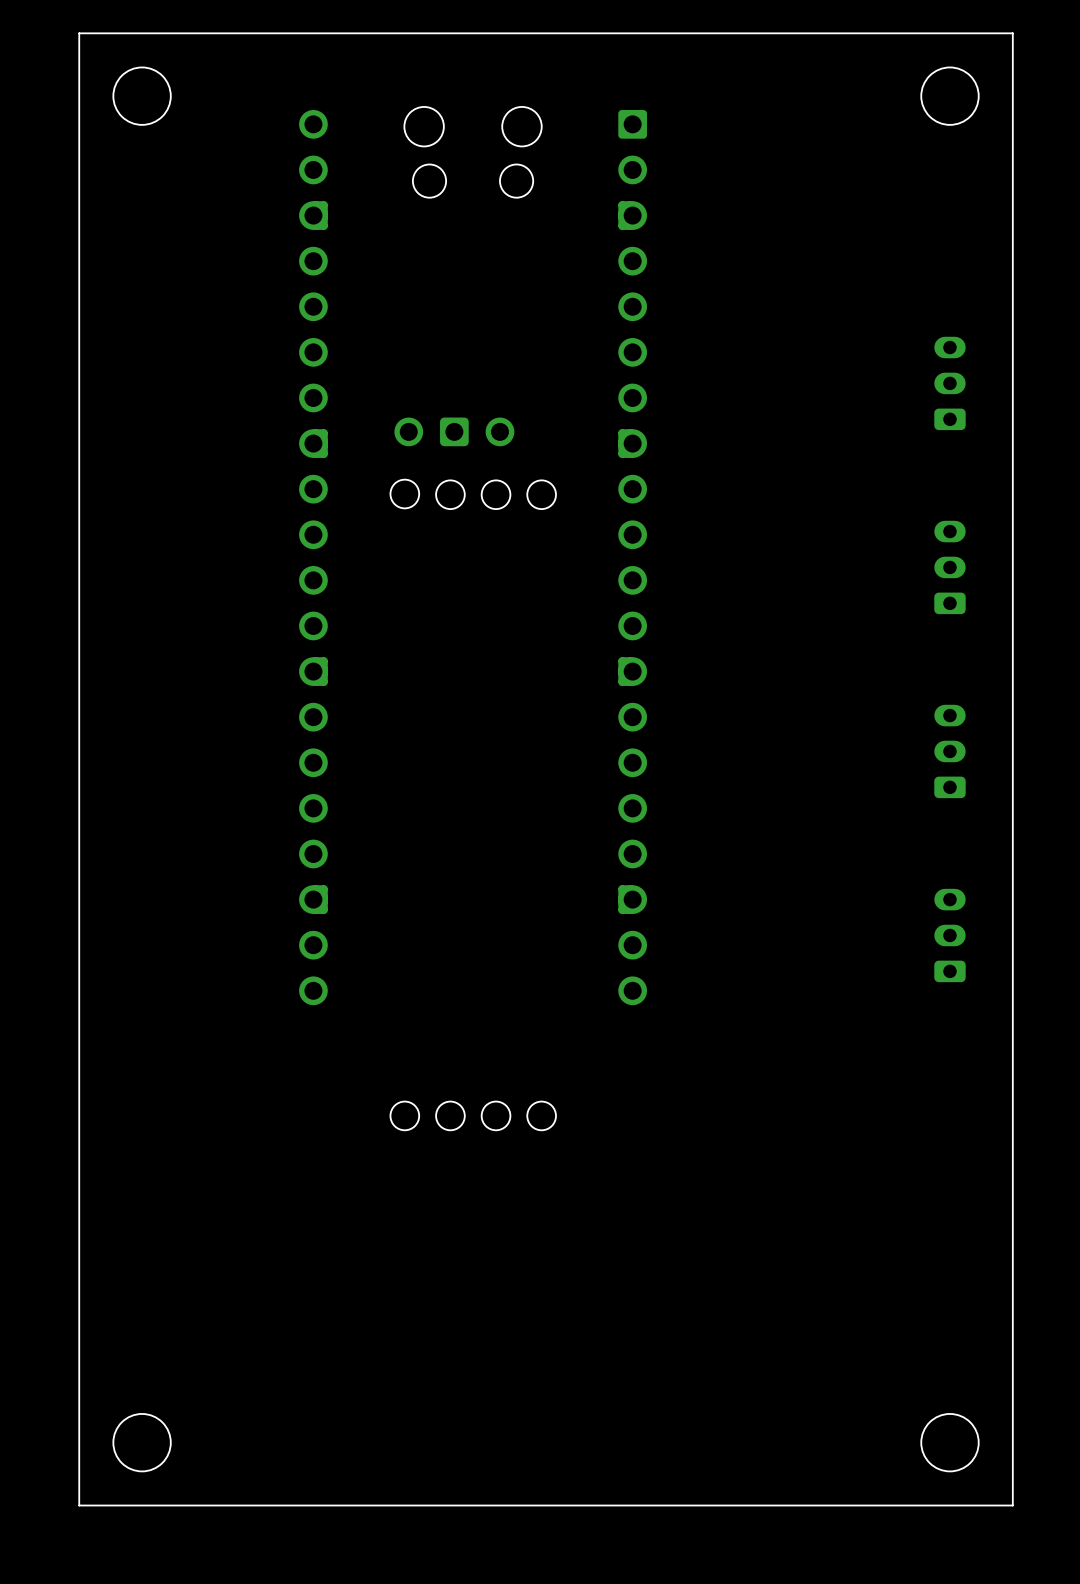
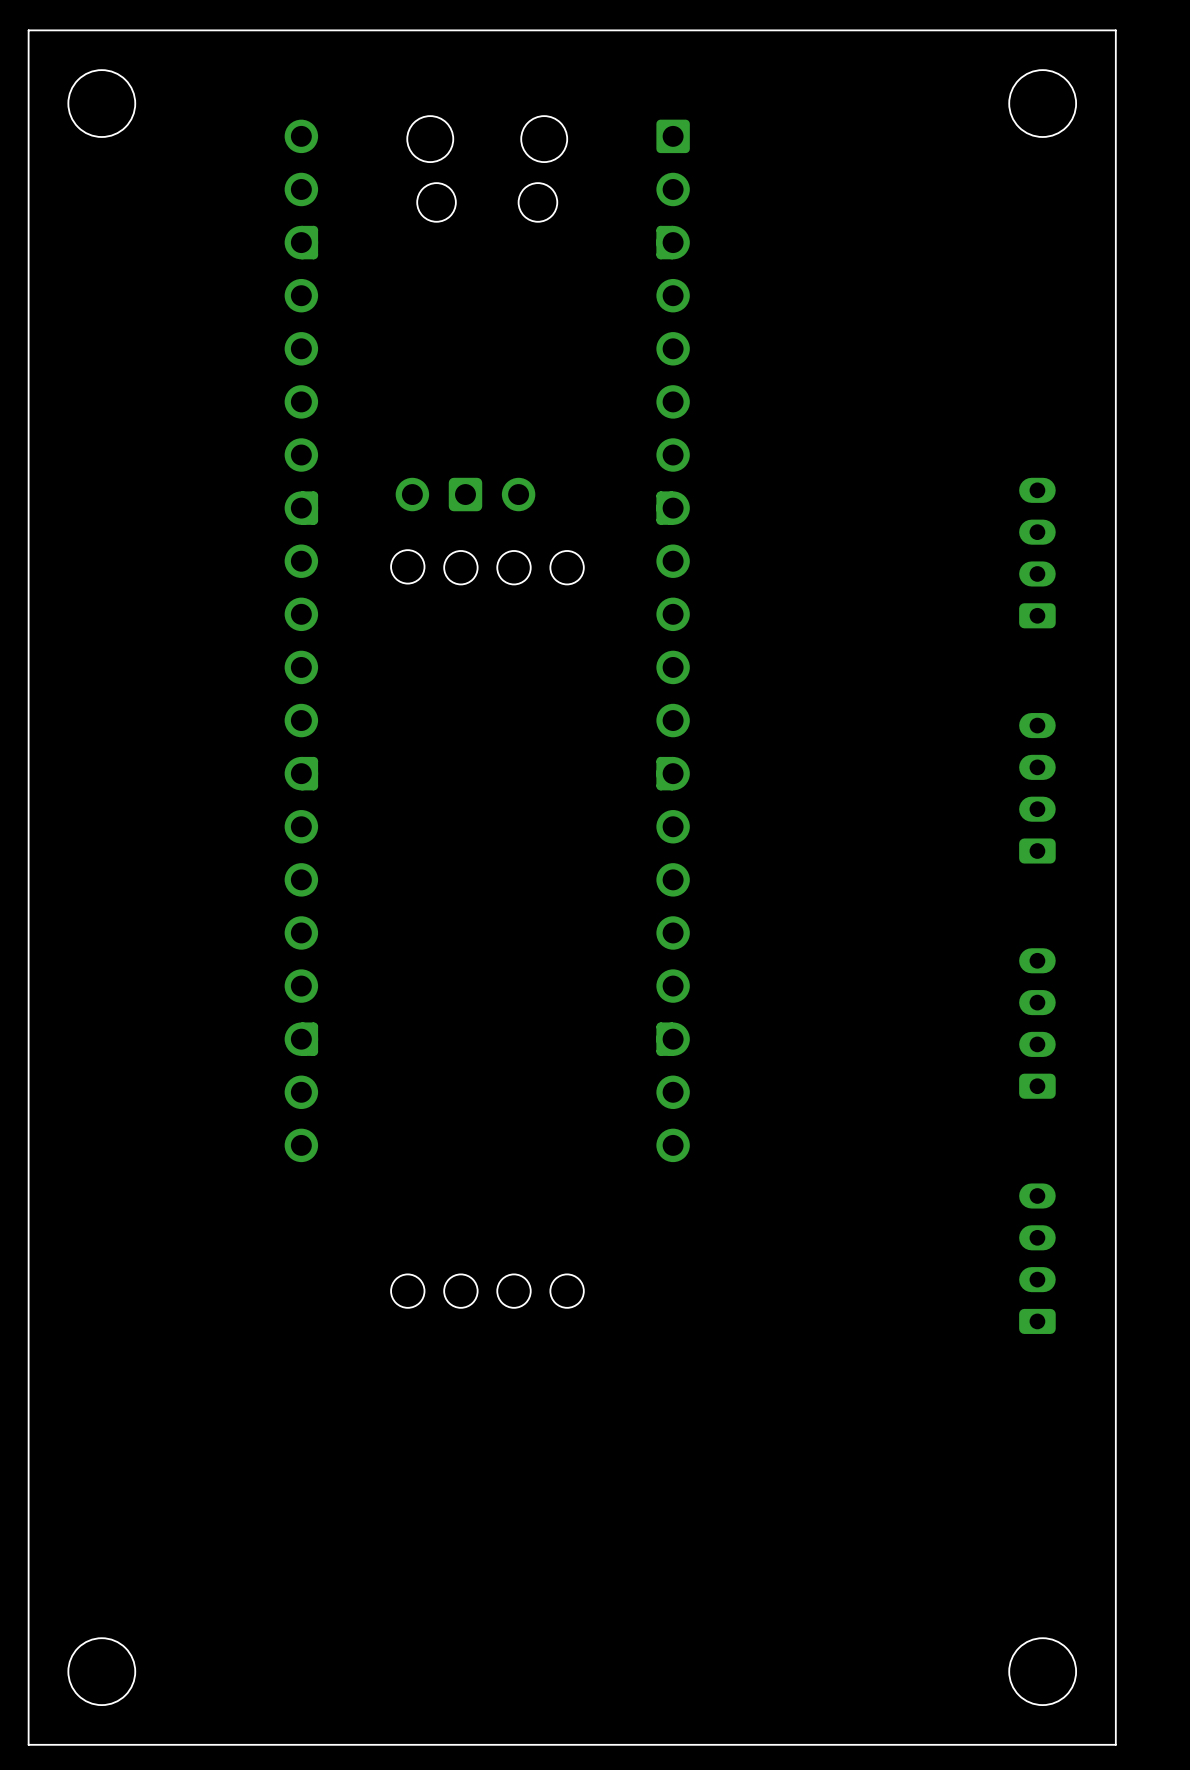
part: (949, 383) -> none
part: none -> (1037, 553)
part: (949, 567) -> none
part: none -> (1037, 788)
part: (949, 751) -> none
part: none -> (1037, 1023)
part: (949, 935) -> none
part: none -> (1037, 1258)

